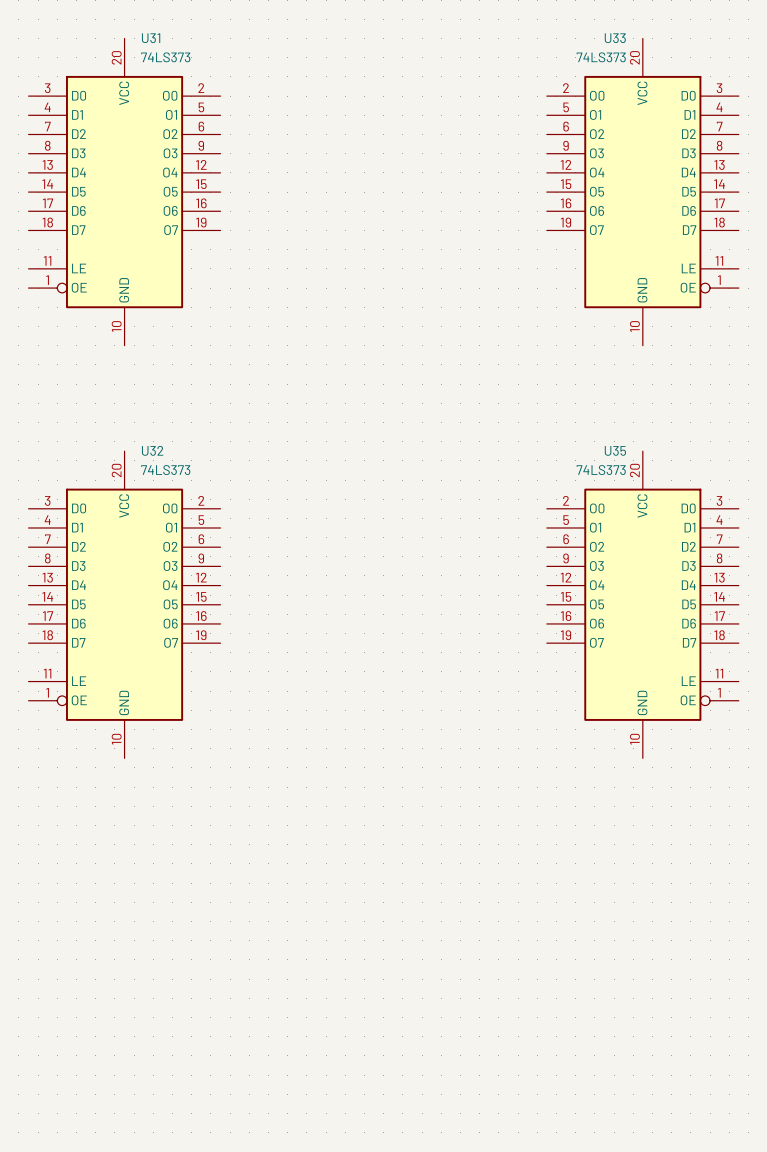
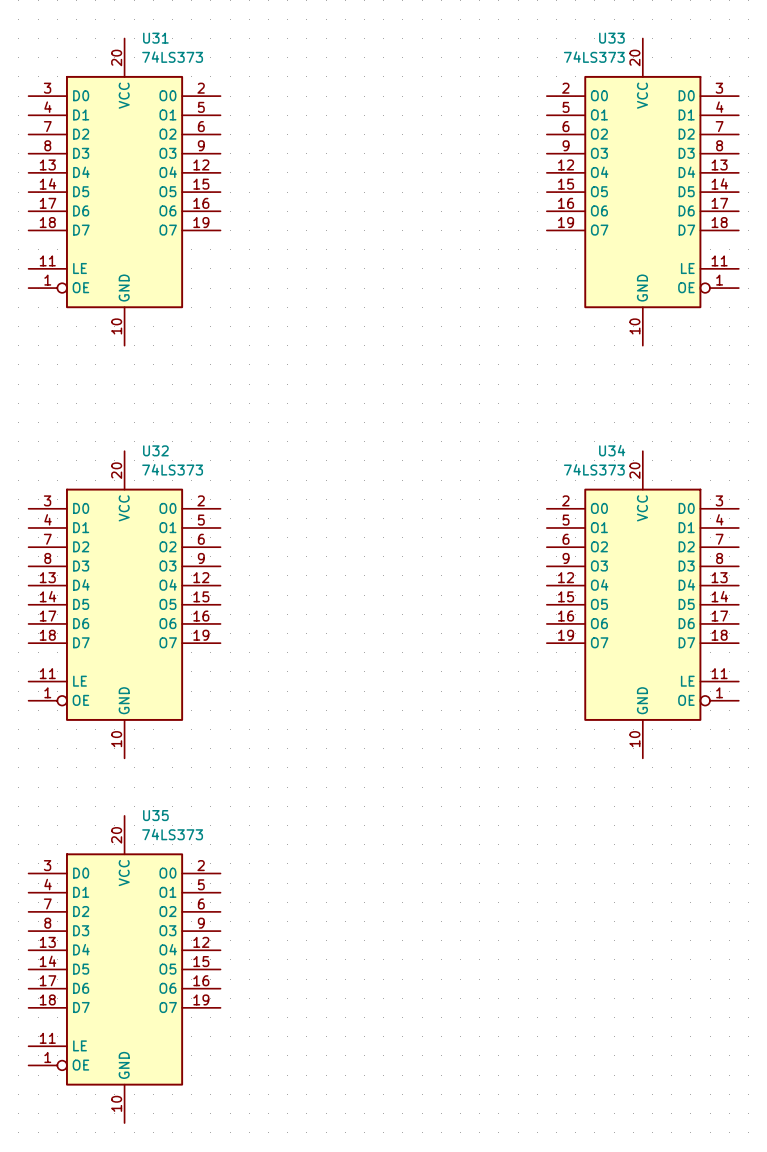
U35 name: U35 (615, 450) -> U34 (612, 450)
U35: none -> 74LS373 (124, 969)

